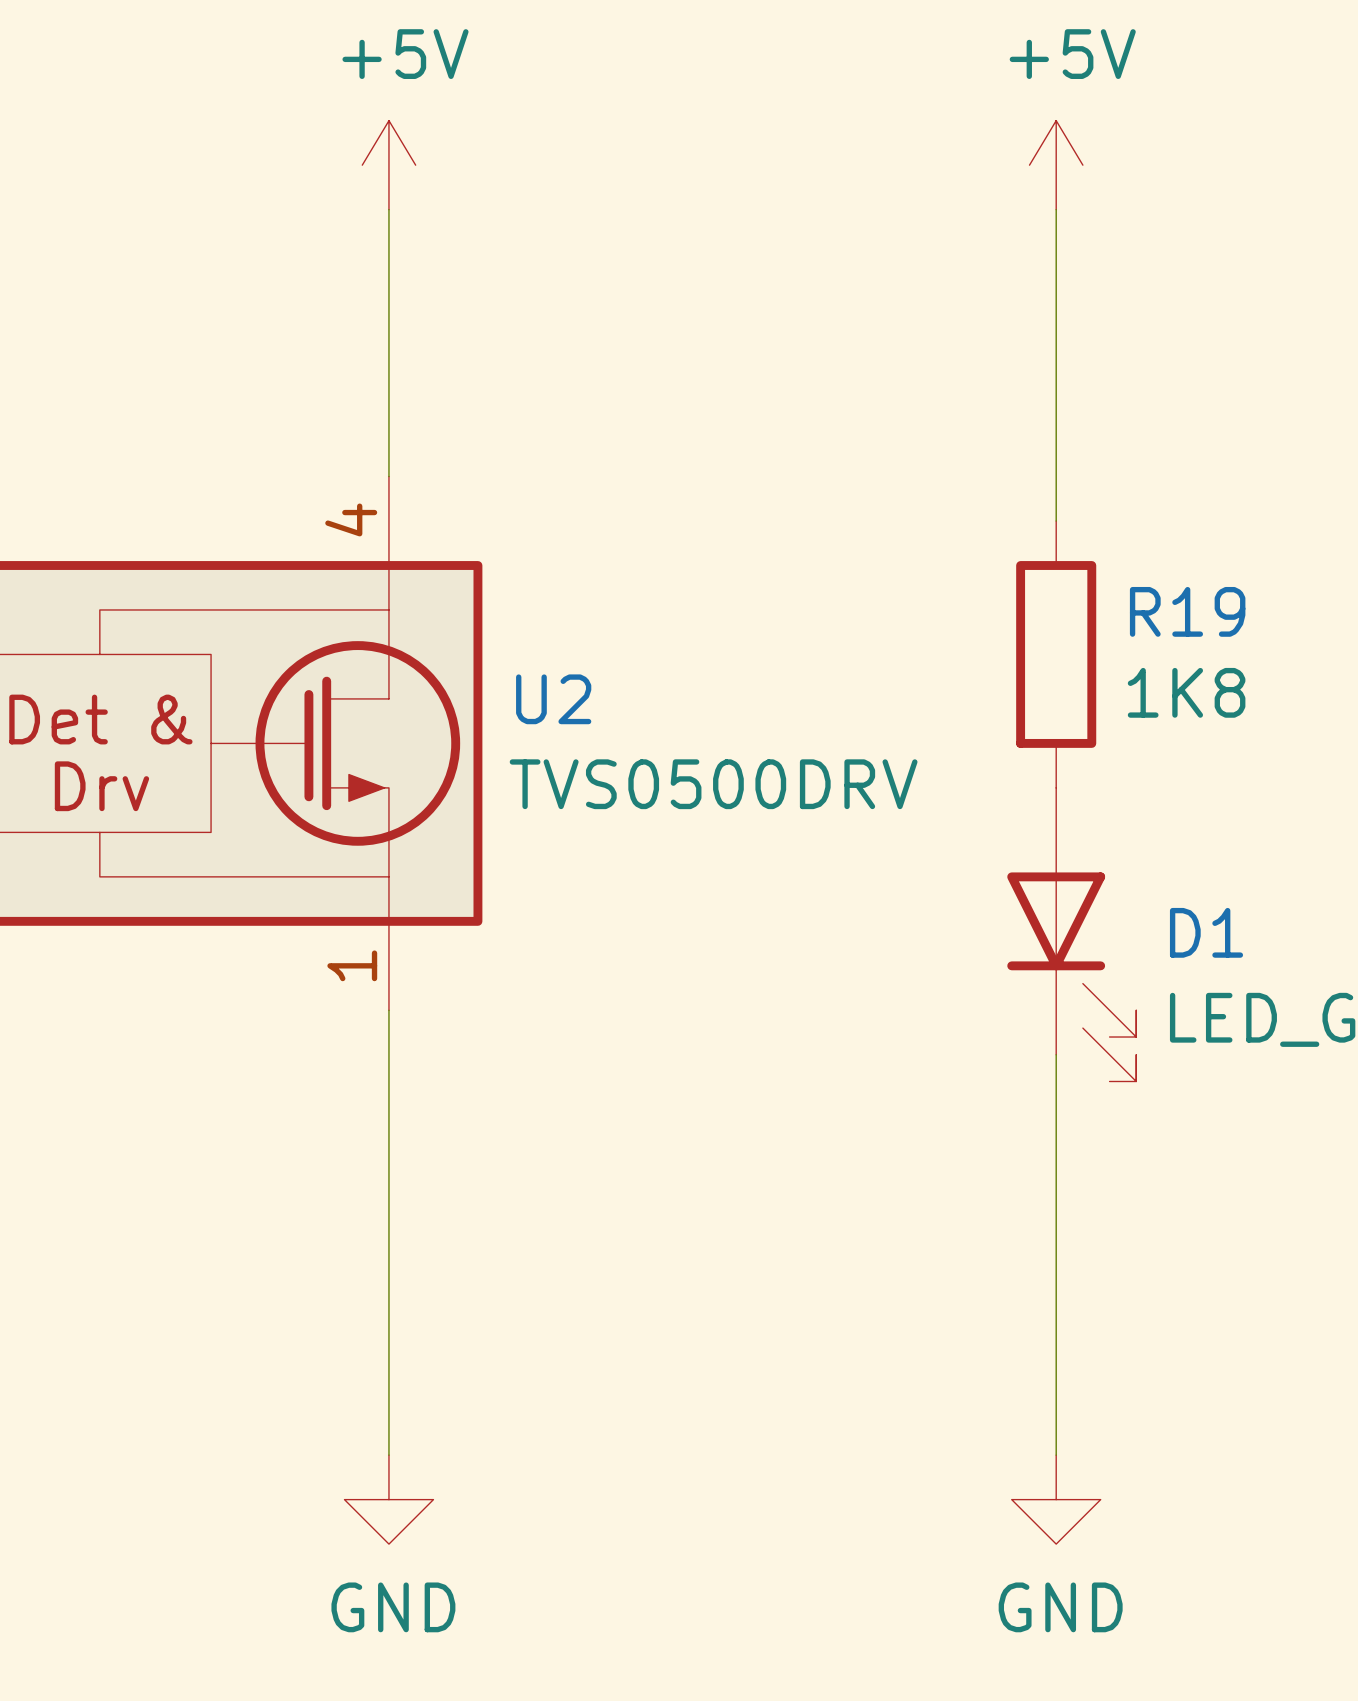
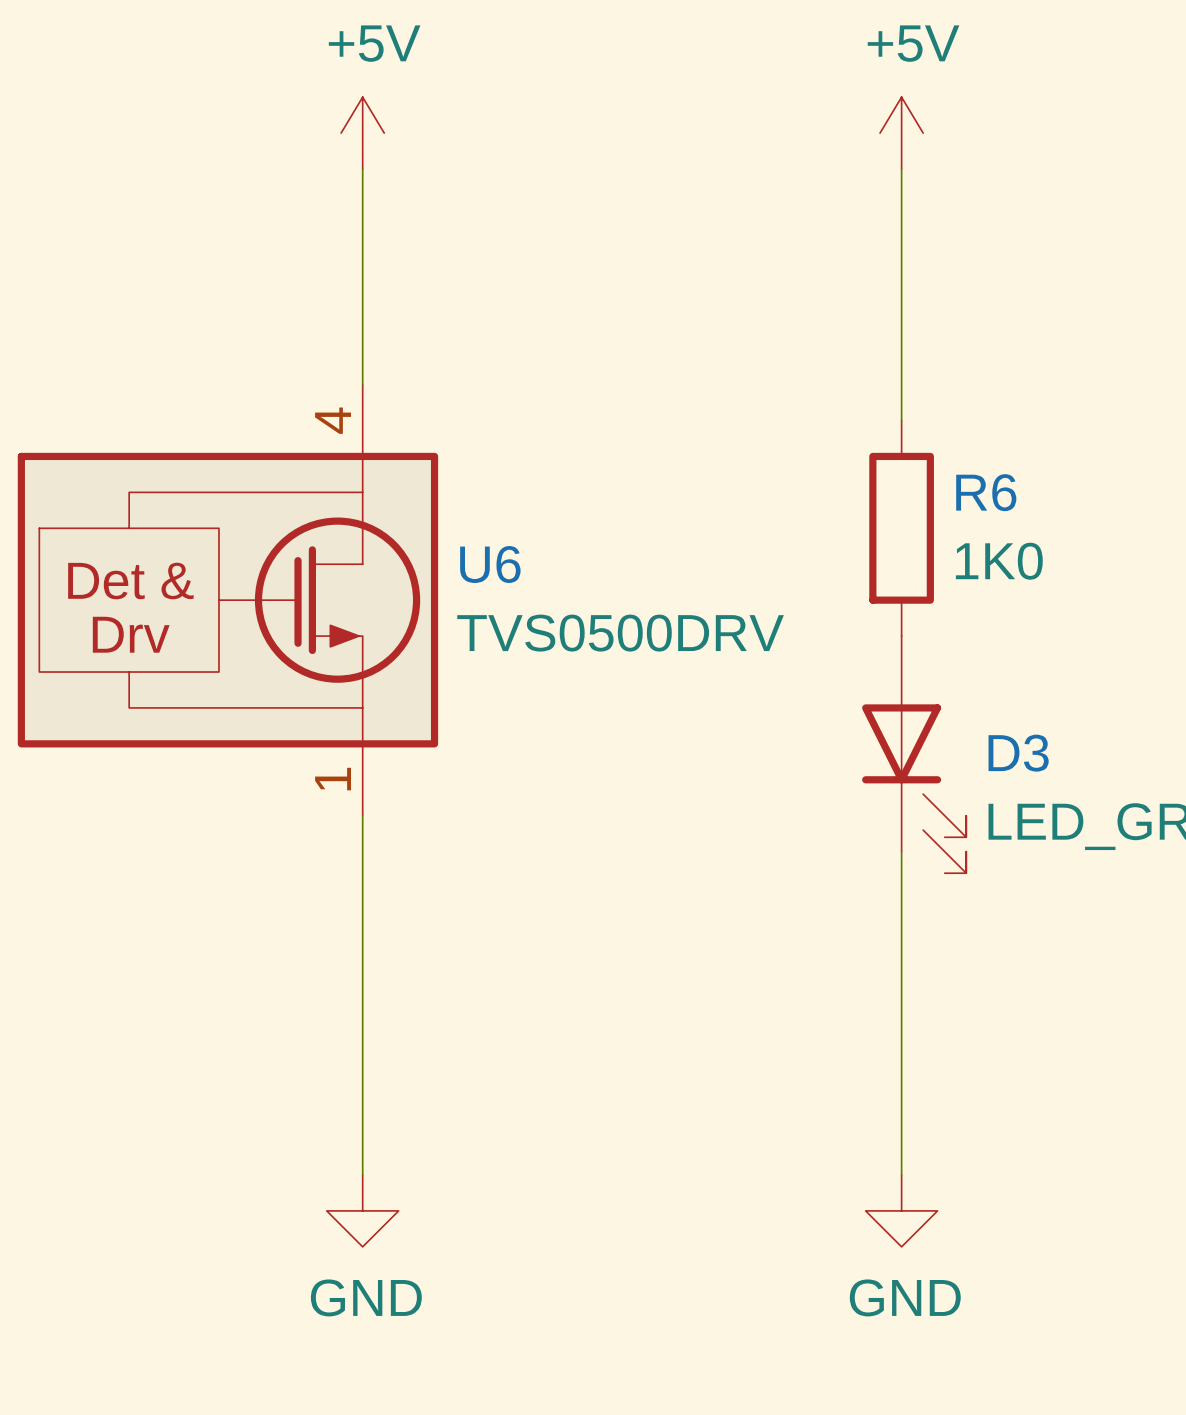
R19 name: R19 (1187, 611) -> R6 (986, 492)
R19 value: 1K8 (1186, 692) -> 1K0 (999, 561)
U2 name: U2 (553, 699) -> U6 (490, 564)
D1 name: D1 (1206, 932) -> D3 (1018, 753)

